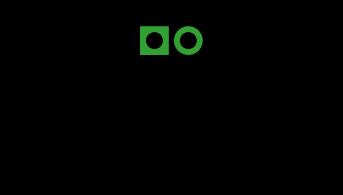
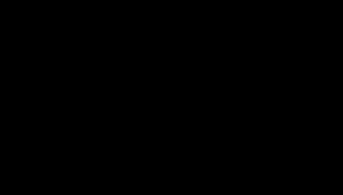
part: (171, 40) -> none

